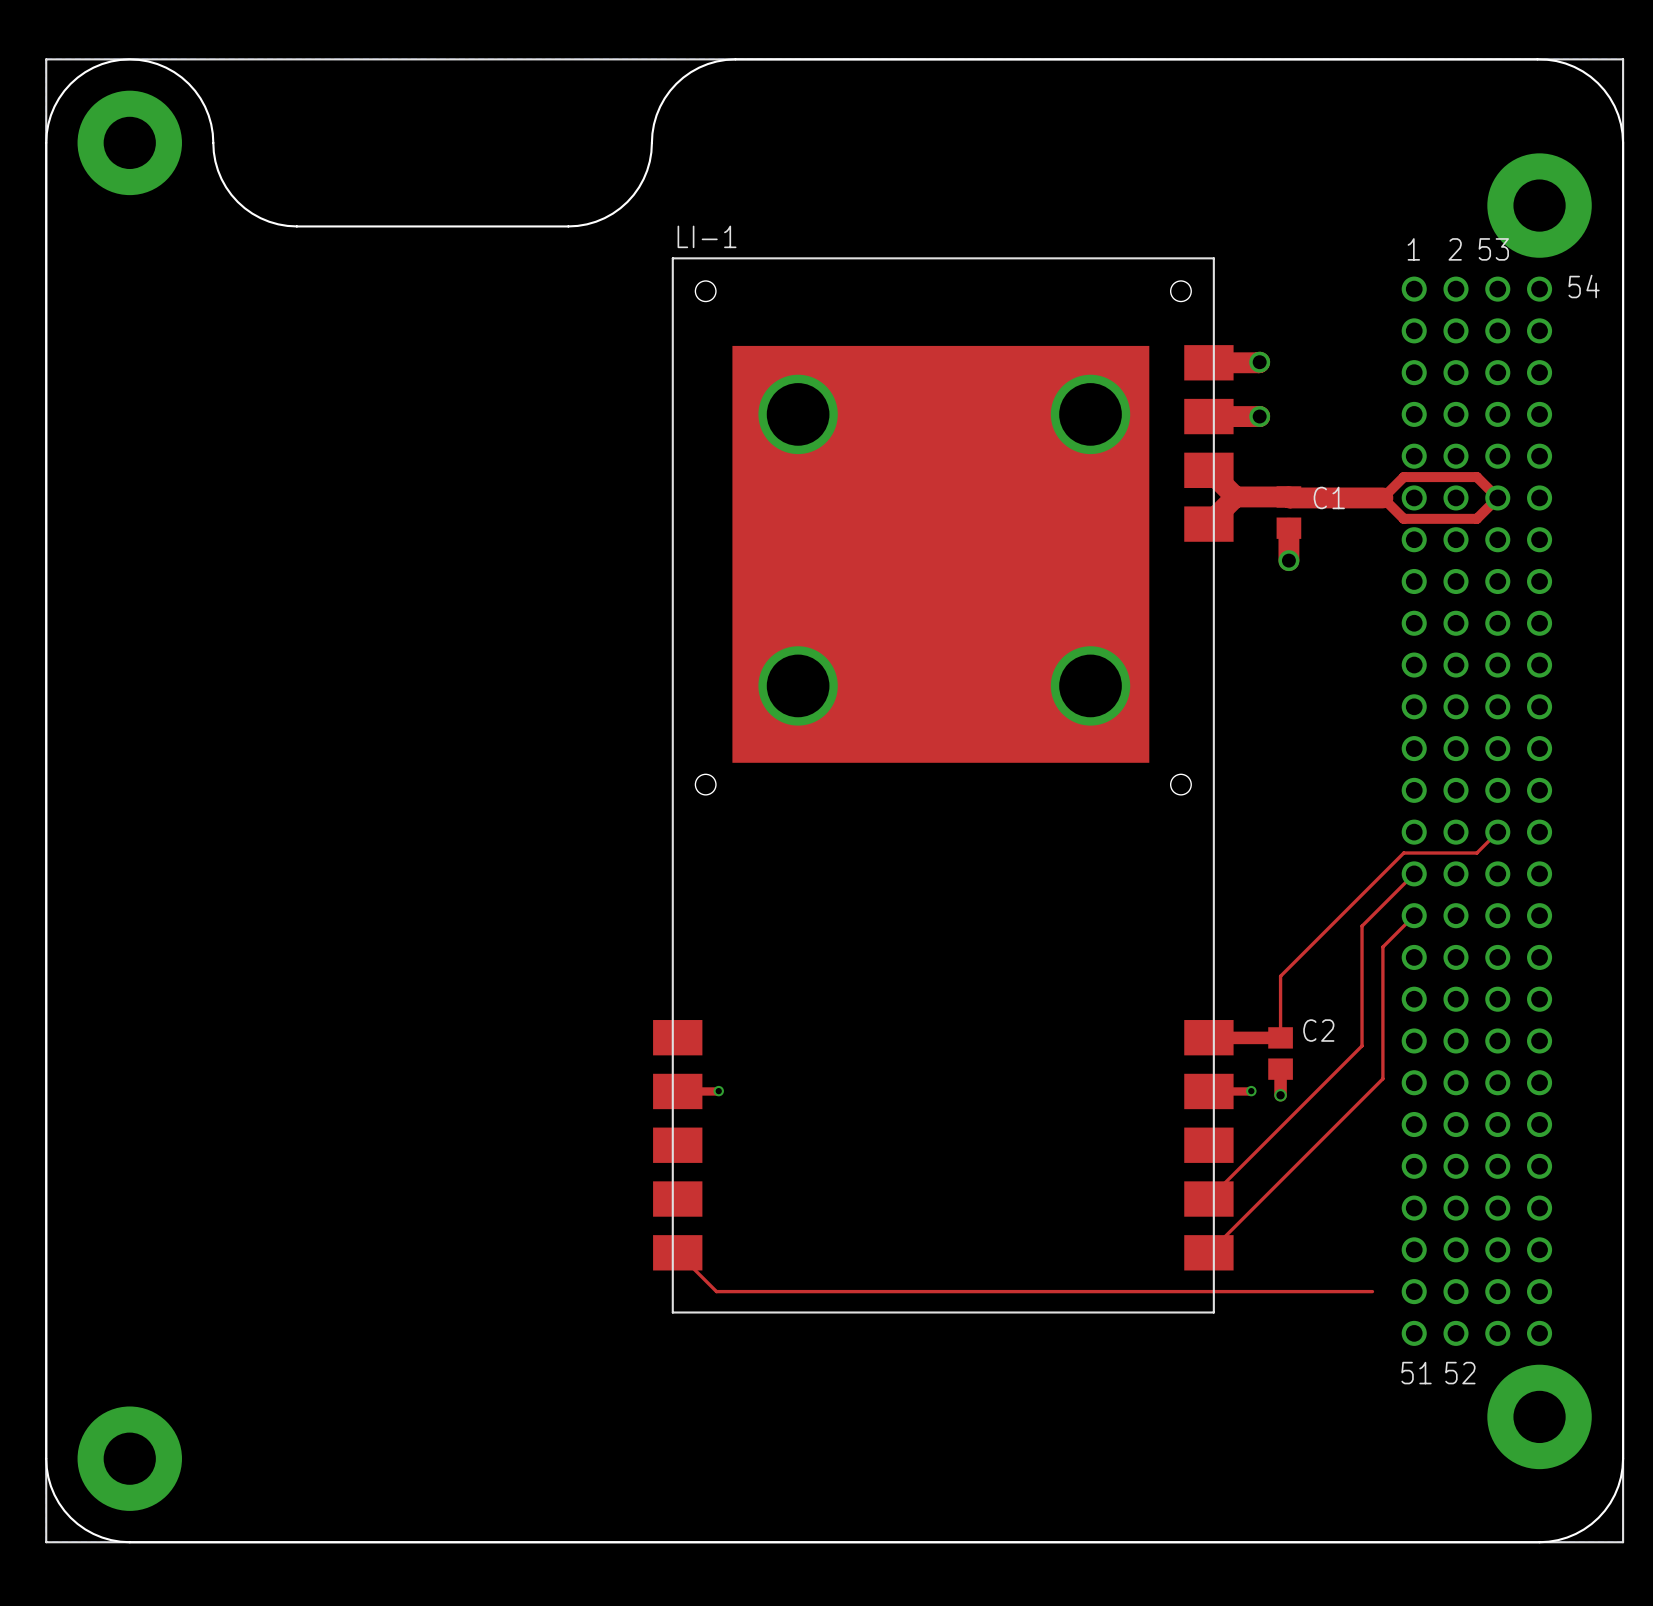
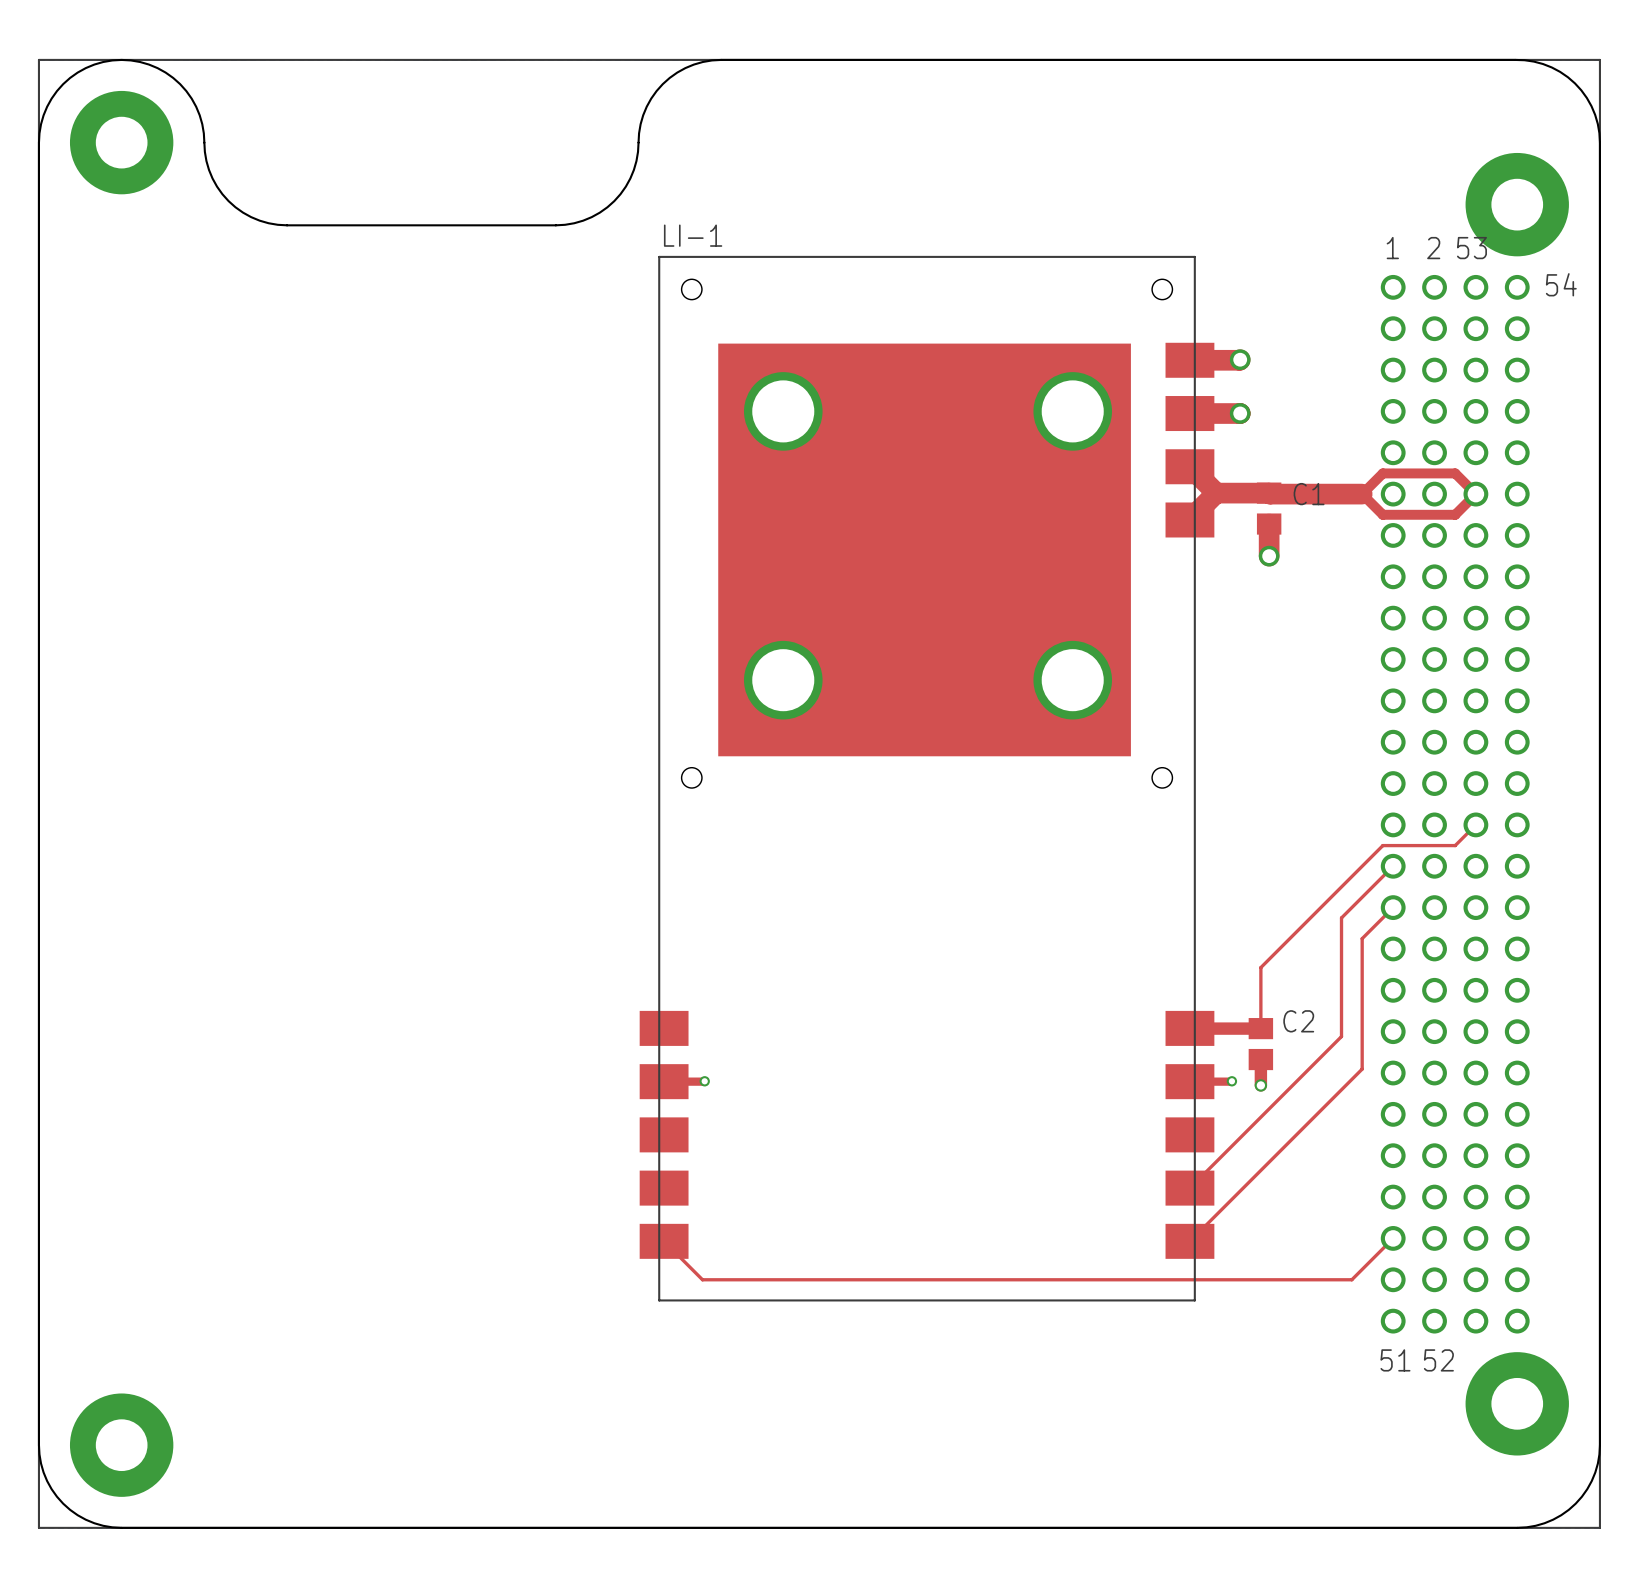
part footprint: [45, 58, 1625, 1544] -> [37, 58, 1601, 1529]
top track: none -> (1393, 1238) (1351, 1279)

